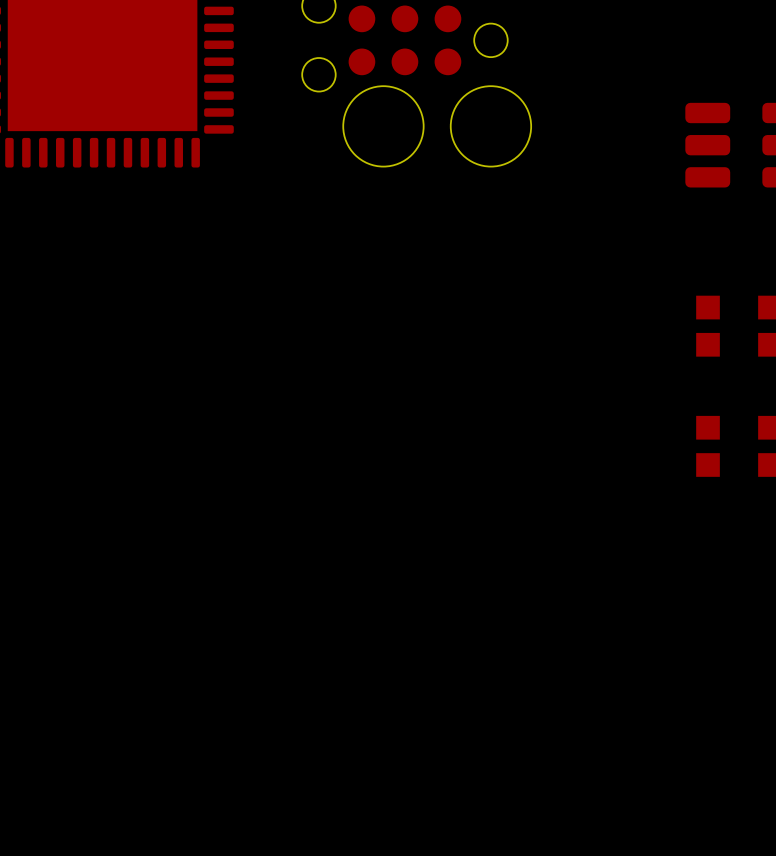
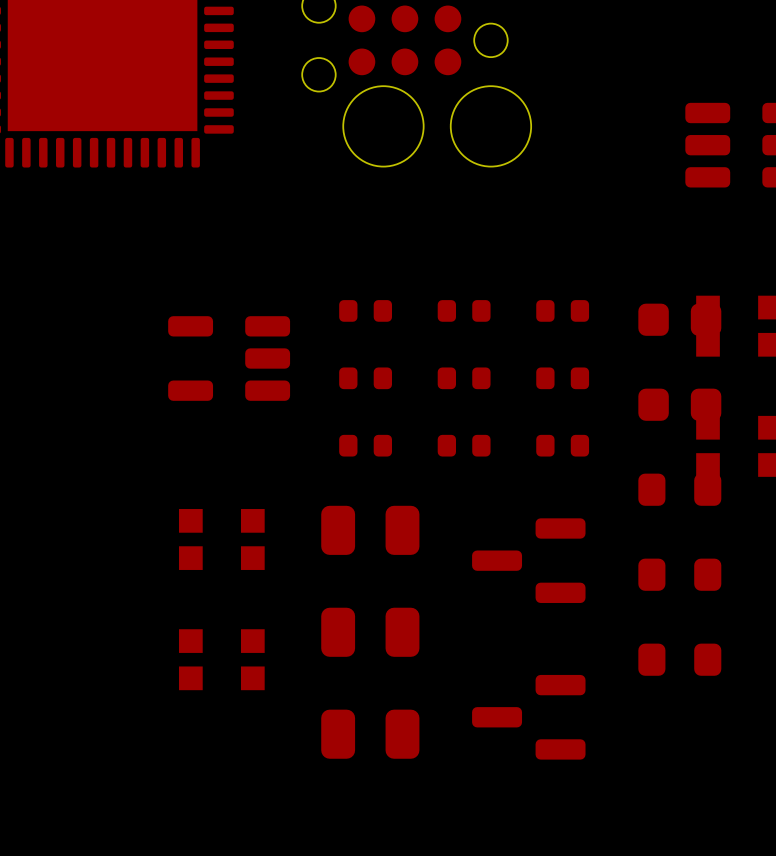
part: none -> (365, 310)
part: none -> (464, 310)
part: none -> (562, 310)
part: none -> (679, 319)
part: none -> (229, 358)
part: none -> (365, 378)
part: none -> (464, 378)
part: none -> (562, 378)
part: none -> (679, 404)
part: none -> (365, 445)
part: none -> (464, 445)
part: none -> (562, 445)
part: none -> (679, 489)
part: none -> (370, 530)
part: none -> (221, 539)
part: none -> (528, 560)
part: none -> (679, 574)
part: none -> (370, 632)
part: none -> (221, 659)
part: none -> (679, 659)
part: none -> (528, 717)
part: none -> (370, 734)

